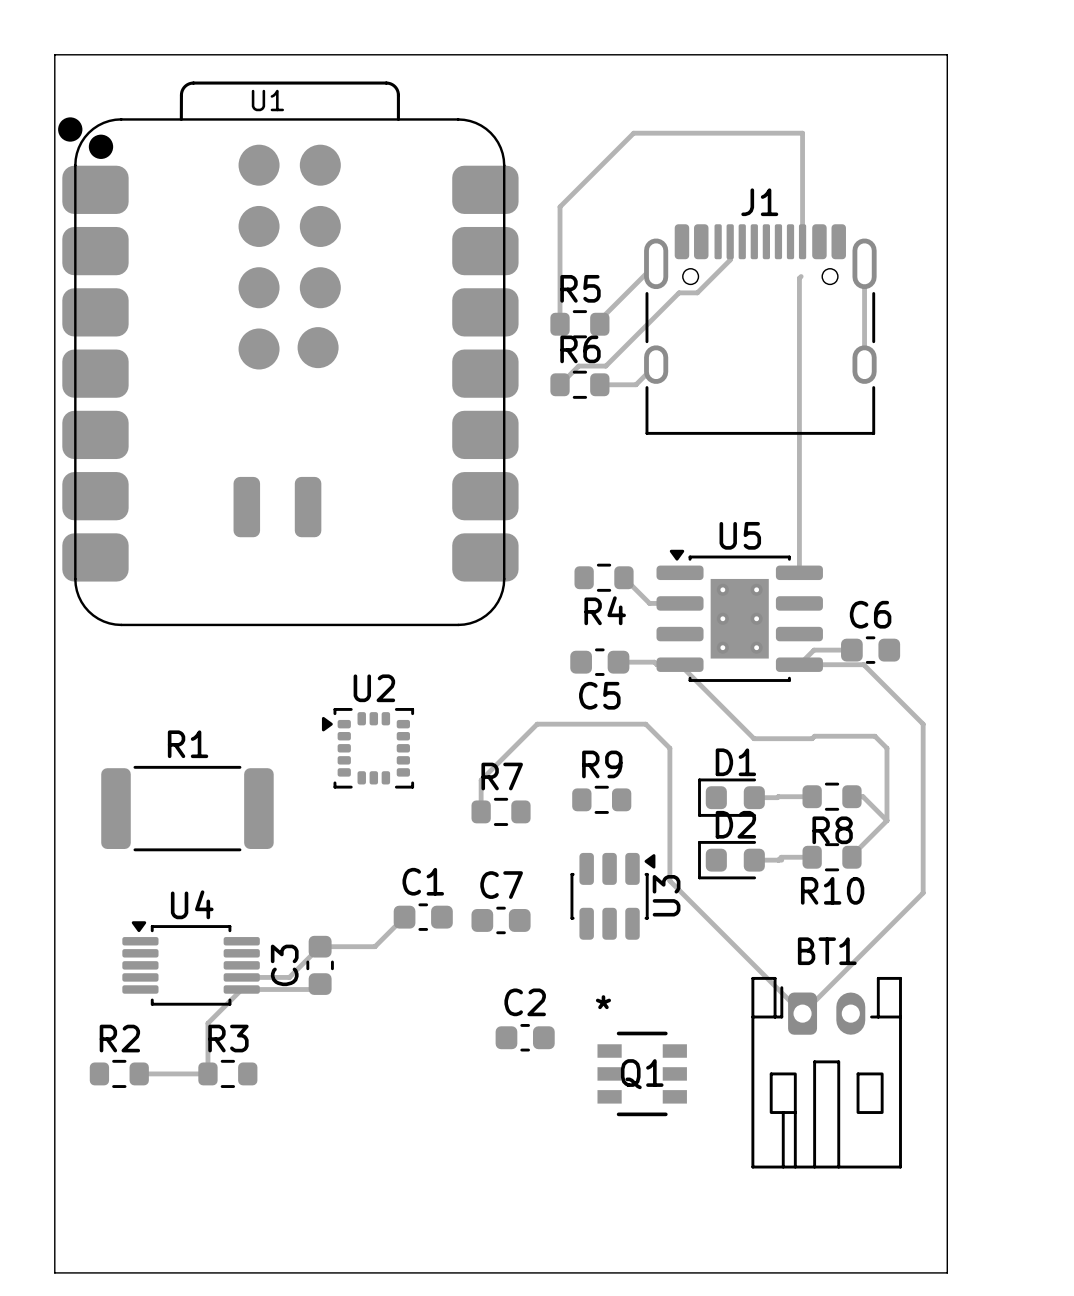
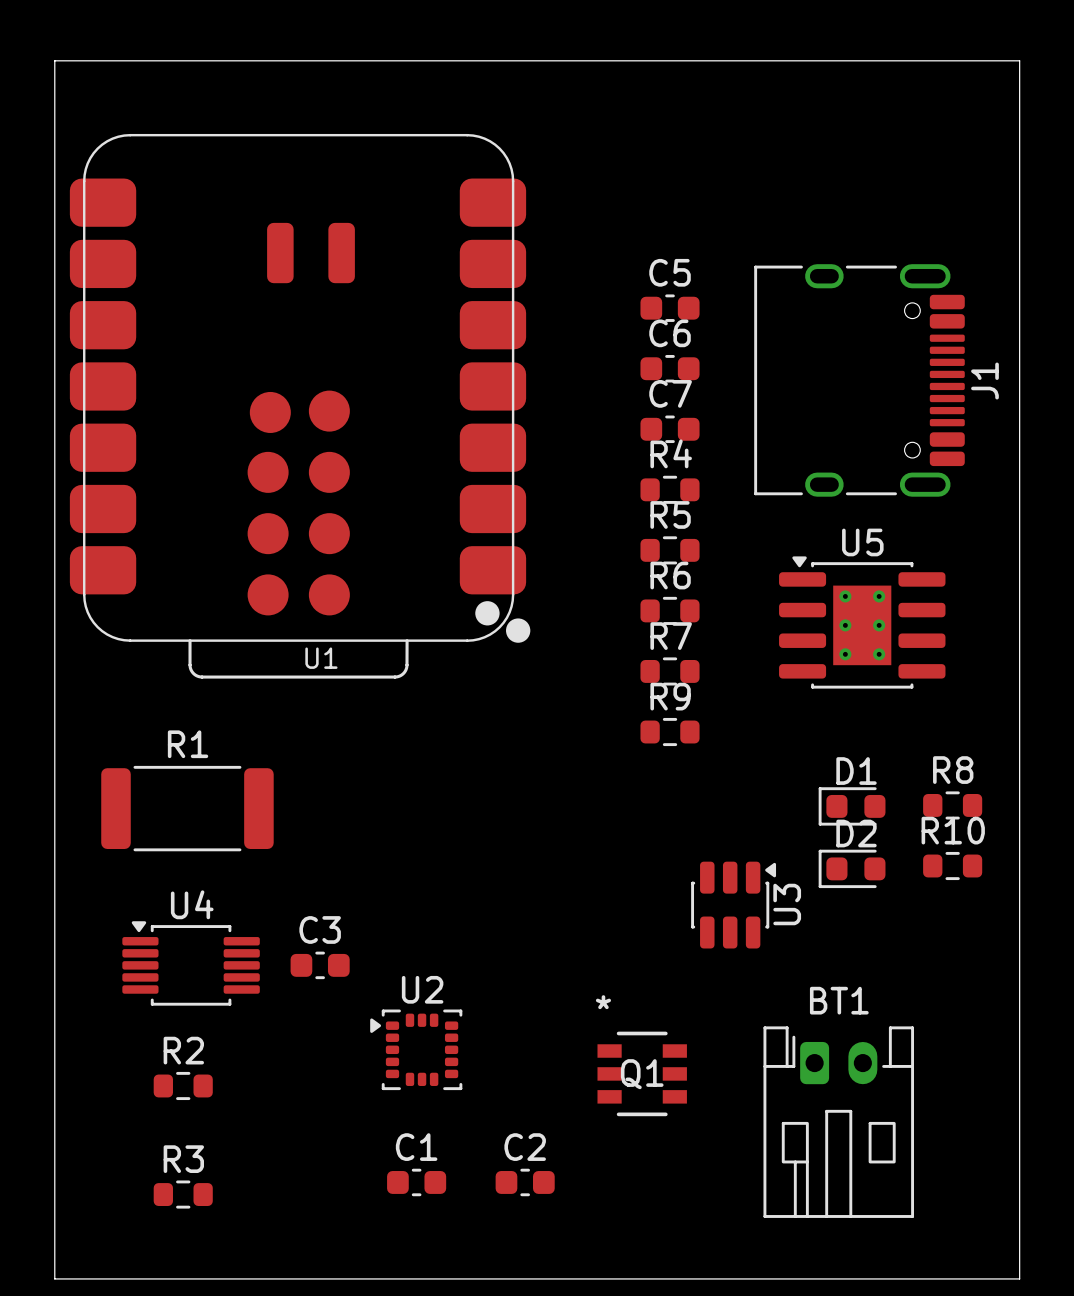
board edge: (54, 60) (54, 54) (947, 54) (947, 1272) (54, 1272) -> (54, 60) (1019, 60) (1019, 1278) (54, 1278) (54, 1272)
track: (730, 241) (730, 260) (697, 292) (679, 292) (605, 366) (578, 366) (560, 384) -> none
track: (802, 241) (802, 133) (633, 133) (560, 206) (560, 324) -> none
track: (656, 263) (599, 320) (599, 324) -> none
track: (864, 263) (864, 364) -> none
track: (801, 276) (799, 278) (799, 572) -> none
R5 position: (579, 324) -> (670, 550)
J1 rotation: 0° (760, 329) -> 90° clockwise (859, 380)
U1 rotation: 0° (288, 353) -> 180° (300, 406)
track: (656, 364) (636, 384) (599, 384) -> none
R6 position: (579, 384) -> (670, 610)
R4 position: (604, 577) -> (670, 489)
track: (623, 577) (649, 603) (680, 603) -> none
R4 name position: R4 (605, 610) -> R4 (671, 453)
U5 position: (739, 615) -> (862, 622)
track: (851, 650) (814, 650) (799, 664) (863, 664) (923, 724) (923, 893) (802, 1013) (669, 880) (669, 748) (645, 724) (537, 724) (481, 780) (481, 811) -> none
C6 position: (870, 650) -> (670, 368)
C5 position: (599, 662) -> (670, 308)
track: (618, 662) (680, 664) (754, 738) (874, 736) (886, 748) (886, 820) -> none
C5 name position: C5 (599, 695) -> C5 (670, 272)
U2 position: (368, 748) -> (416, 1049)
track: (778, 796) (812, 796) -> none
track: (778, 796) (754, 797) -> none
R8 position: (832, 796) -> (952, 805)
track: (851, 796) (863, 796) (886, 820) -> none
D1 position: (731, 797) -> (852, 806)
R9 position: (601, 799) -> (670, 732)
R7 position: (501, 811) -> (670, 671)
track: (886, 820) (851, 857) -> none
R8 name position: R8 (832, 830) -> R8 (953, 770)
track: (812, 857) (781, 857) (778, 860) -> none
R10 position: (832, 857) -> (952, 866)
D2 position: (731, 860) -> (852, 868)
track: (754, 860) (781, 860) -> none
R10 name position: R10 (832, 890) -> R10 (953, 830)
U3 position: (612, 896) -> (733, 905)
track: (404, 917) (375, 946) (320, 946) (289, 977) (241, 977) -> none
C1 position: (423, 917) -> (416, 1182)
C7 position: (501, 920) -> (670, 429)
C3 rotation: 0° (320, 965) -> 90° clockwise (320, 965)
track: (320, 984) (314, 989) (241, 989) (207, 1023) (207, 1073) (139, 1073) -> none
C2 position: (525, 1037) -> (525, 1182)
BT1 position: (826, 1072) -> (838, 1122)
R2 position: (119, 1073) -> (183, 1085)
R3 position: (227, 1073) -> (183, 1194)

